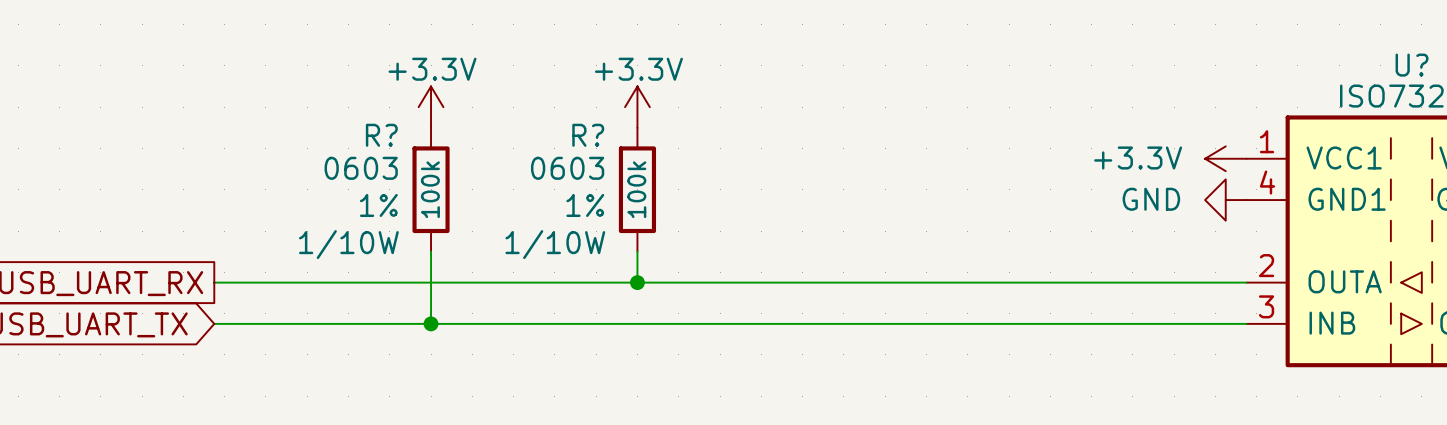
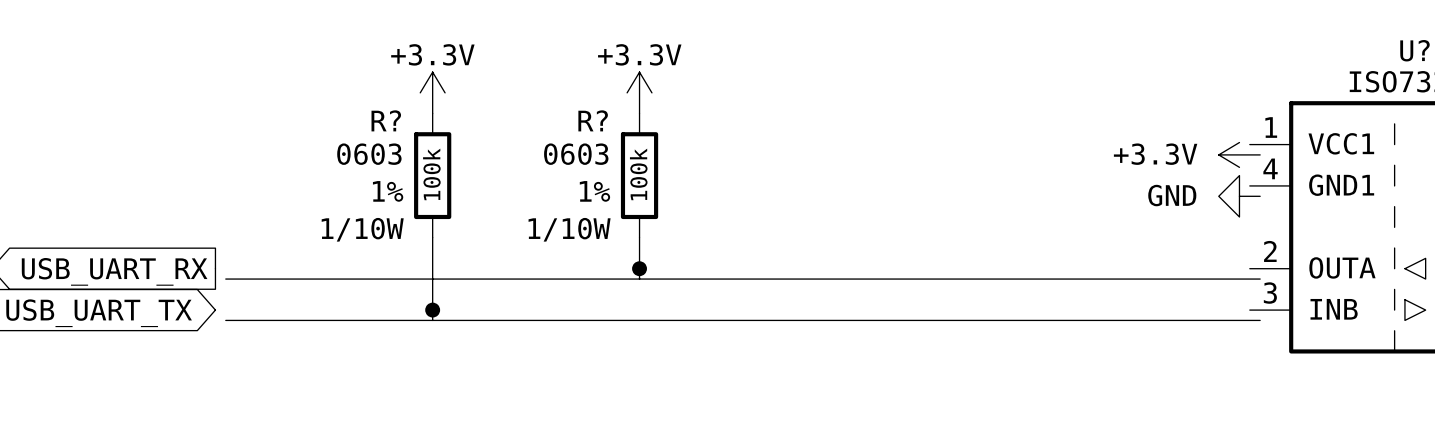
power symbol position: +3.3V (1225, 158) -> +3.3V (1239, 154)
power symbol position: GND (1225, 200) -> GND (1239, 196)
wire: (214, 282) (1246, 282) -> (225, 279) (1260, 279)
wire: (214, 323) (1246, 323) -> (225, 320) (1260, 320)

